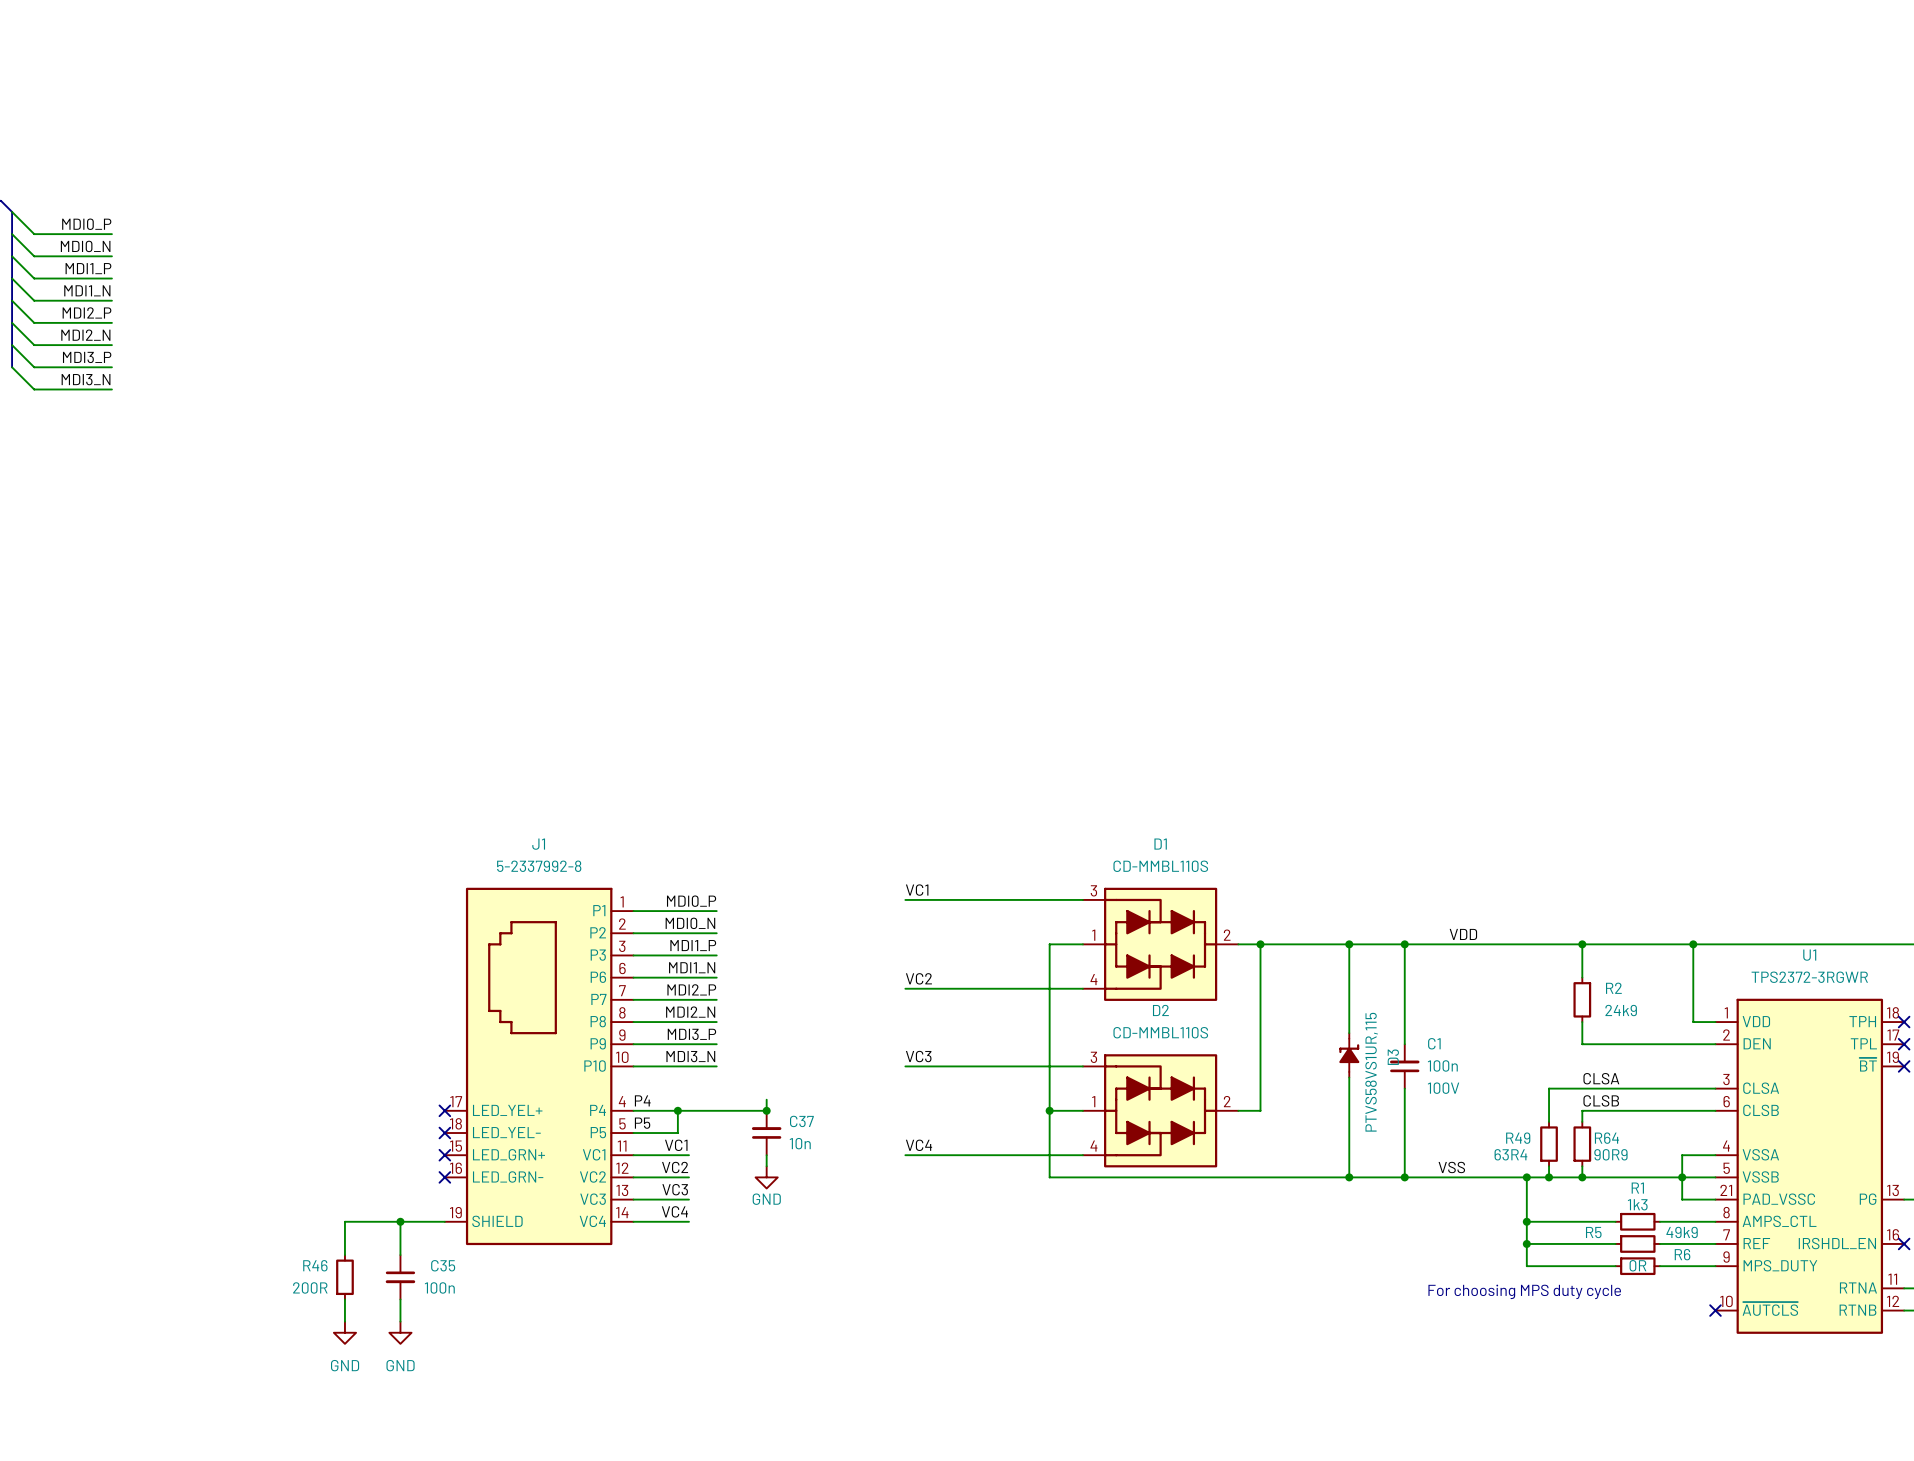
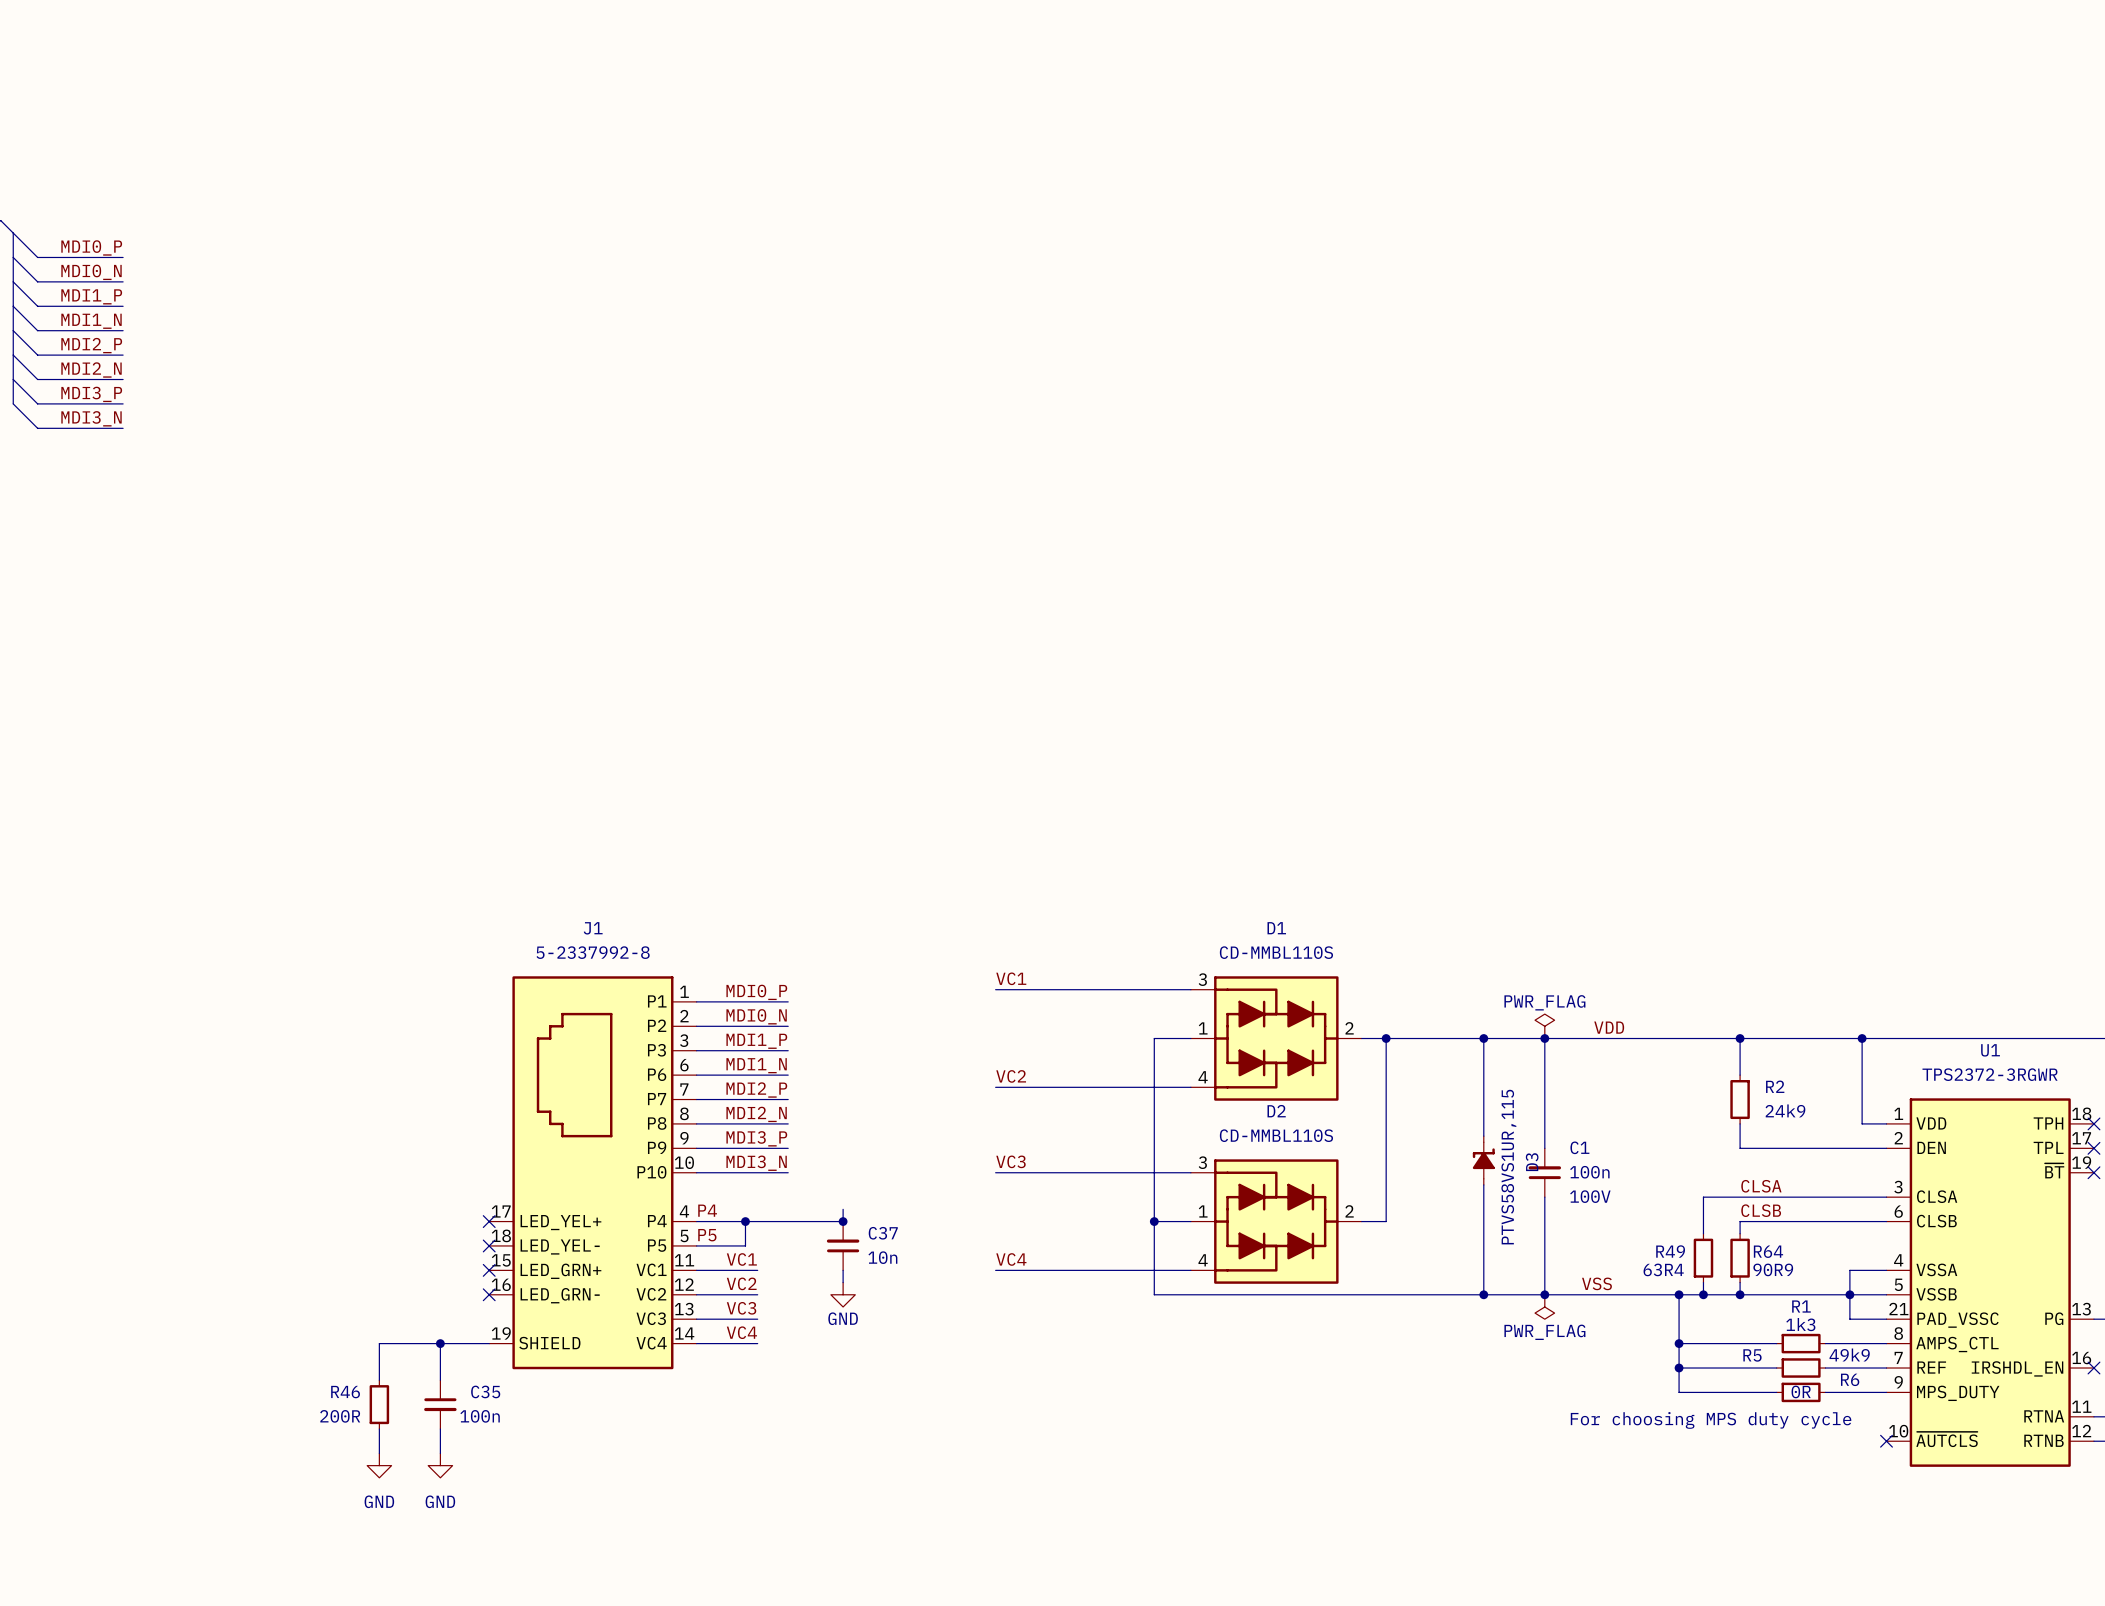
power symbol: none -> PWR_FLAG (1544, 1026)
power symbol: none -> PWR_FLAG (1544, 1306)

